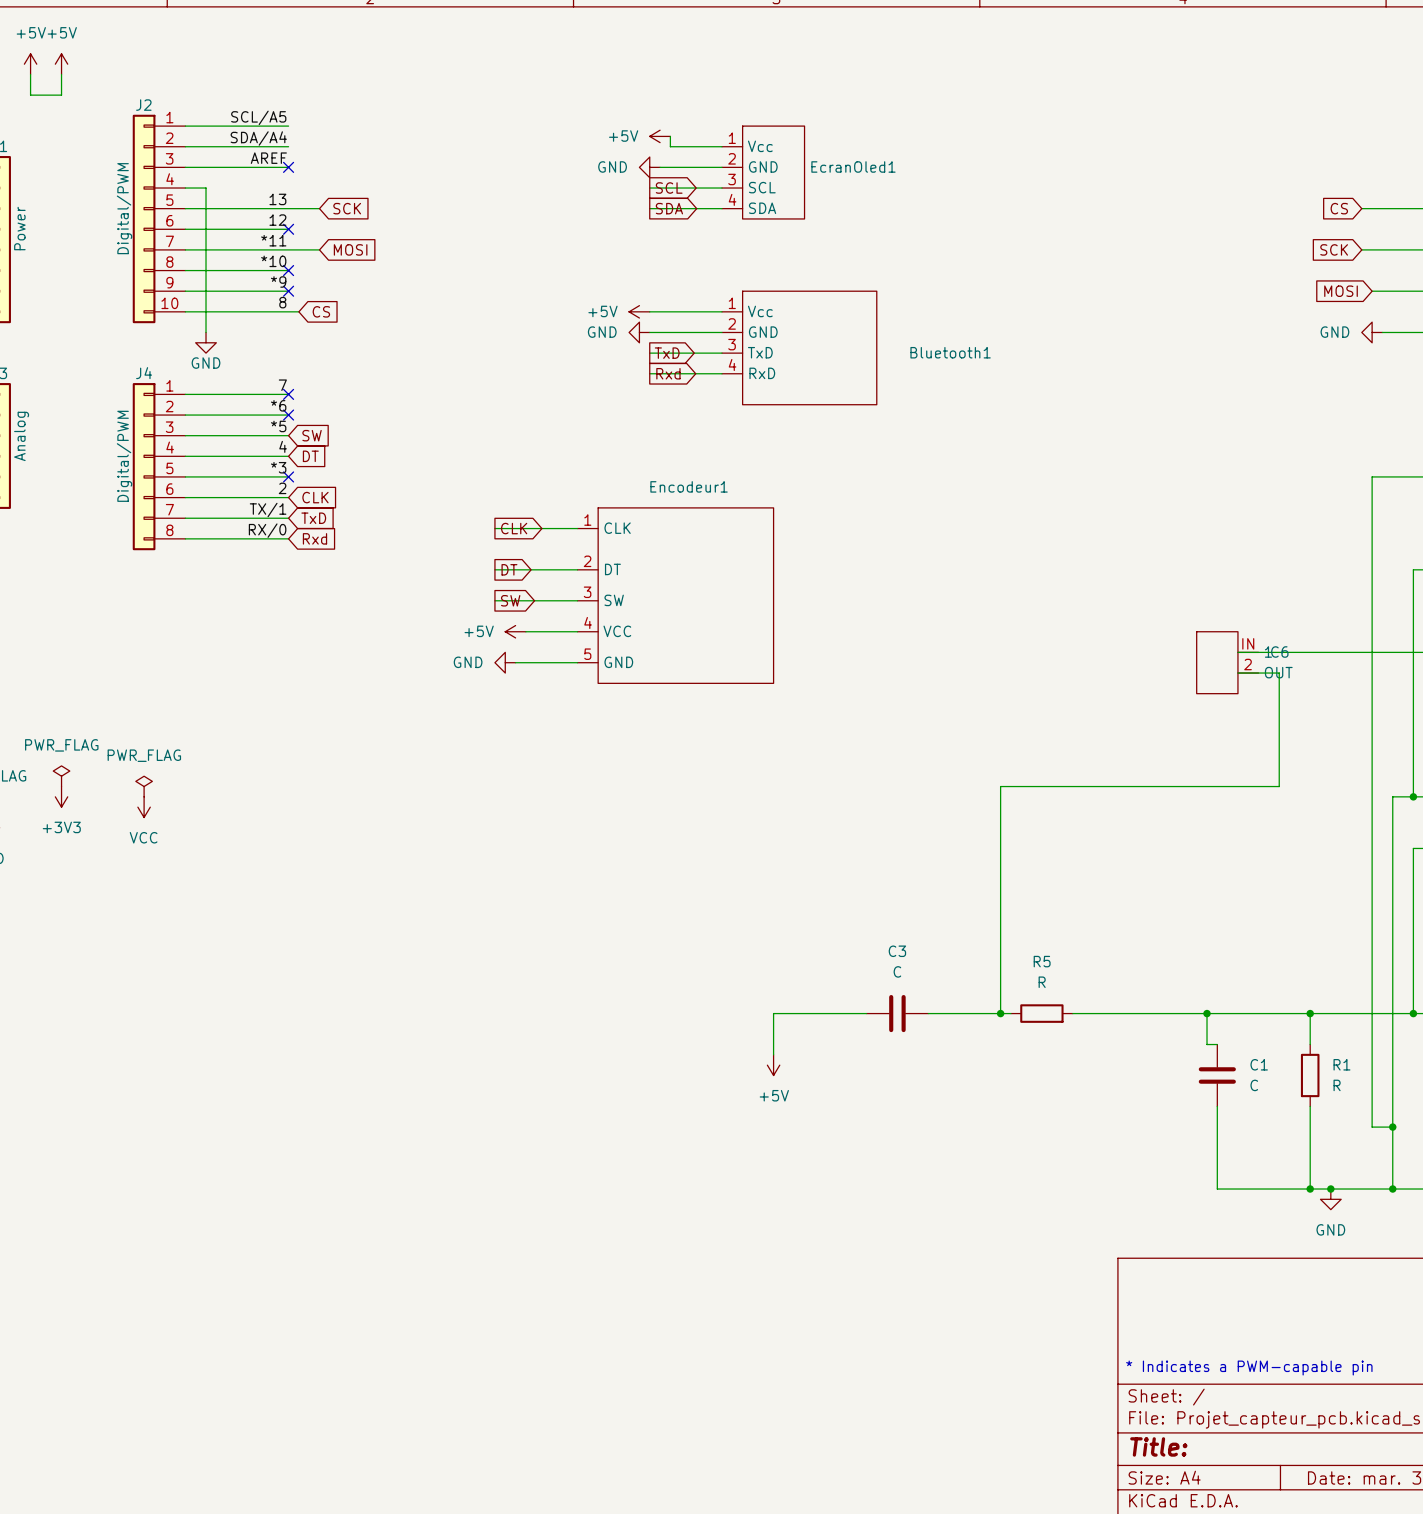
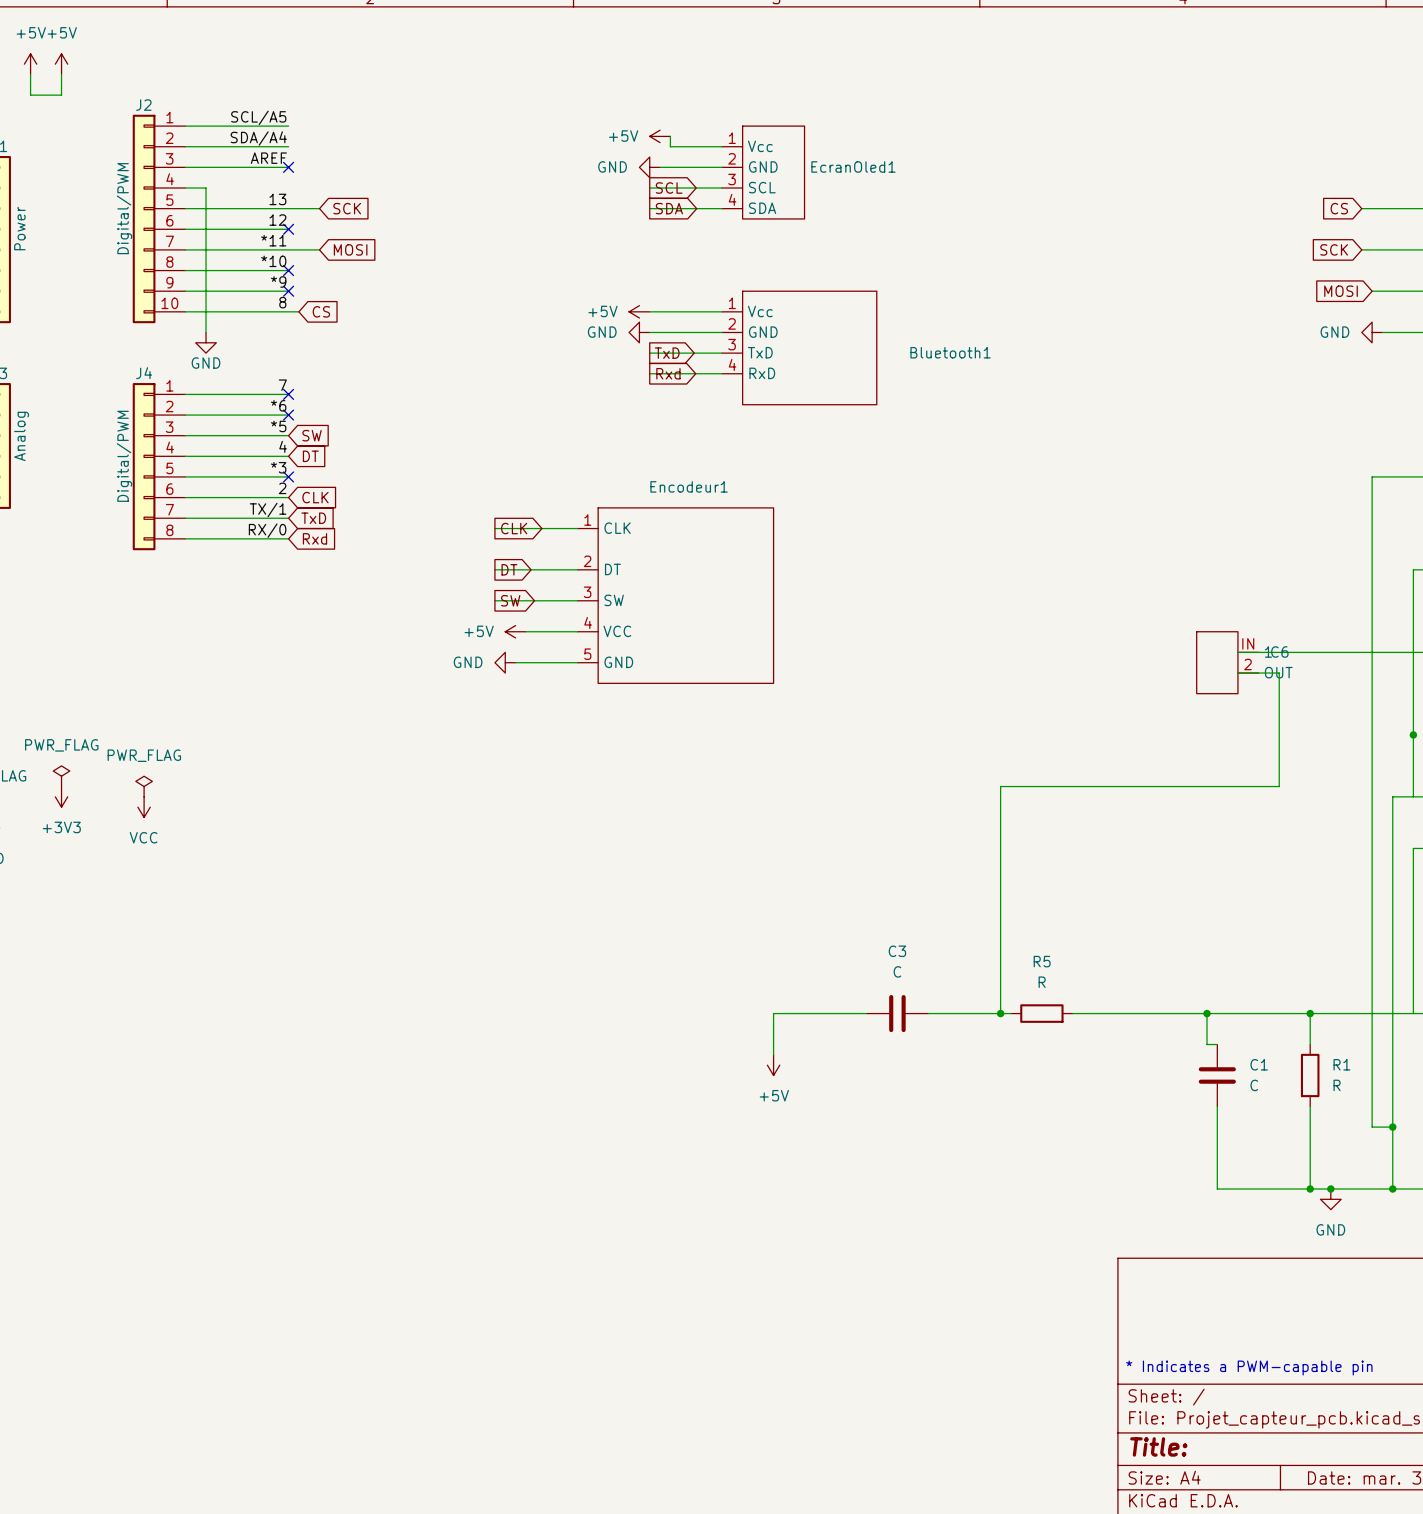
junction: none -> (1413, 734)
junction: (1413, 796) -> none
junction: (1413, 1013) -> none

